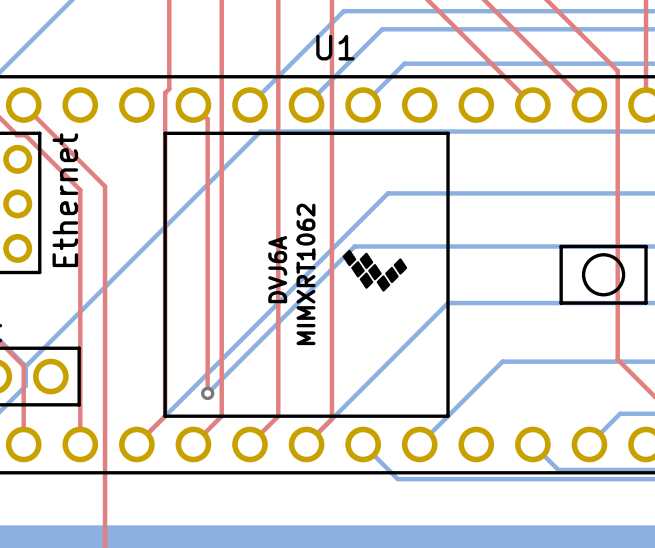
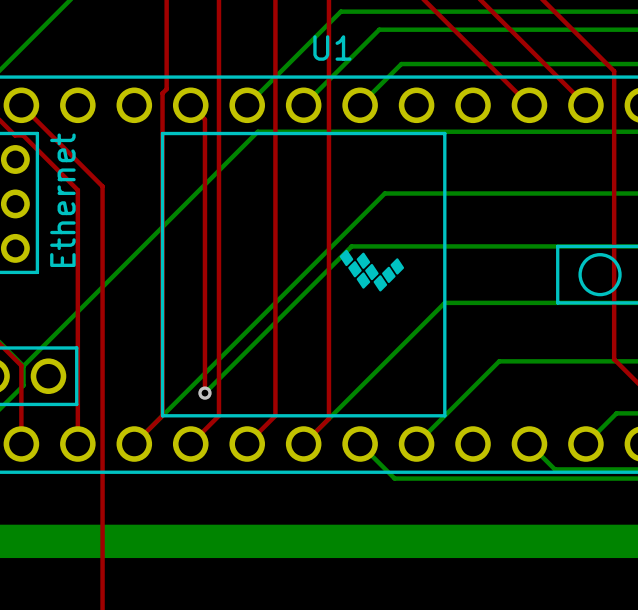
U1 text: DVJ6A (277, 269) -> none
U1 text: MIMXRT1062 (306, 274) -> none

